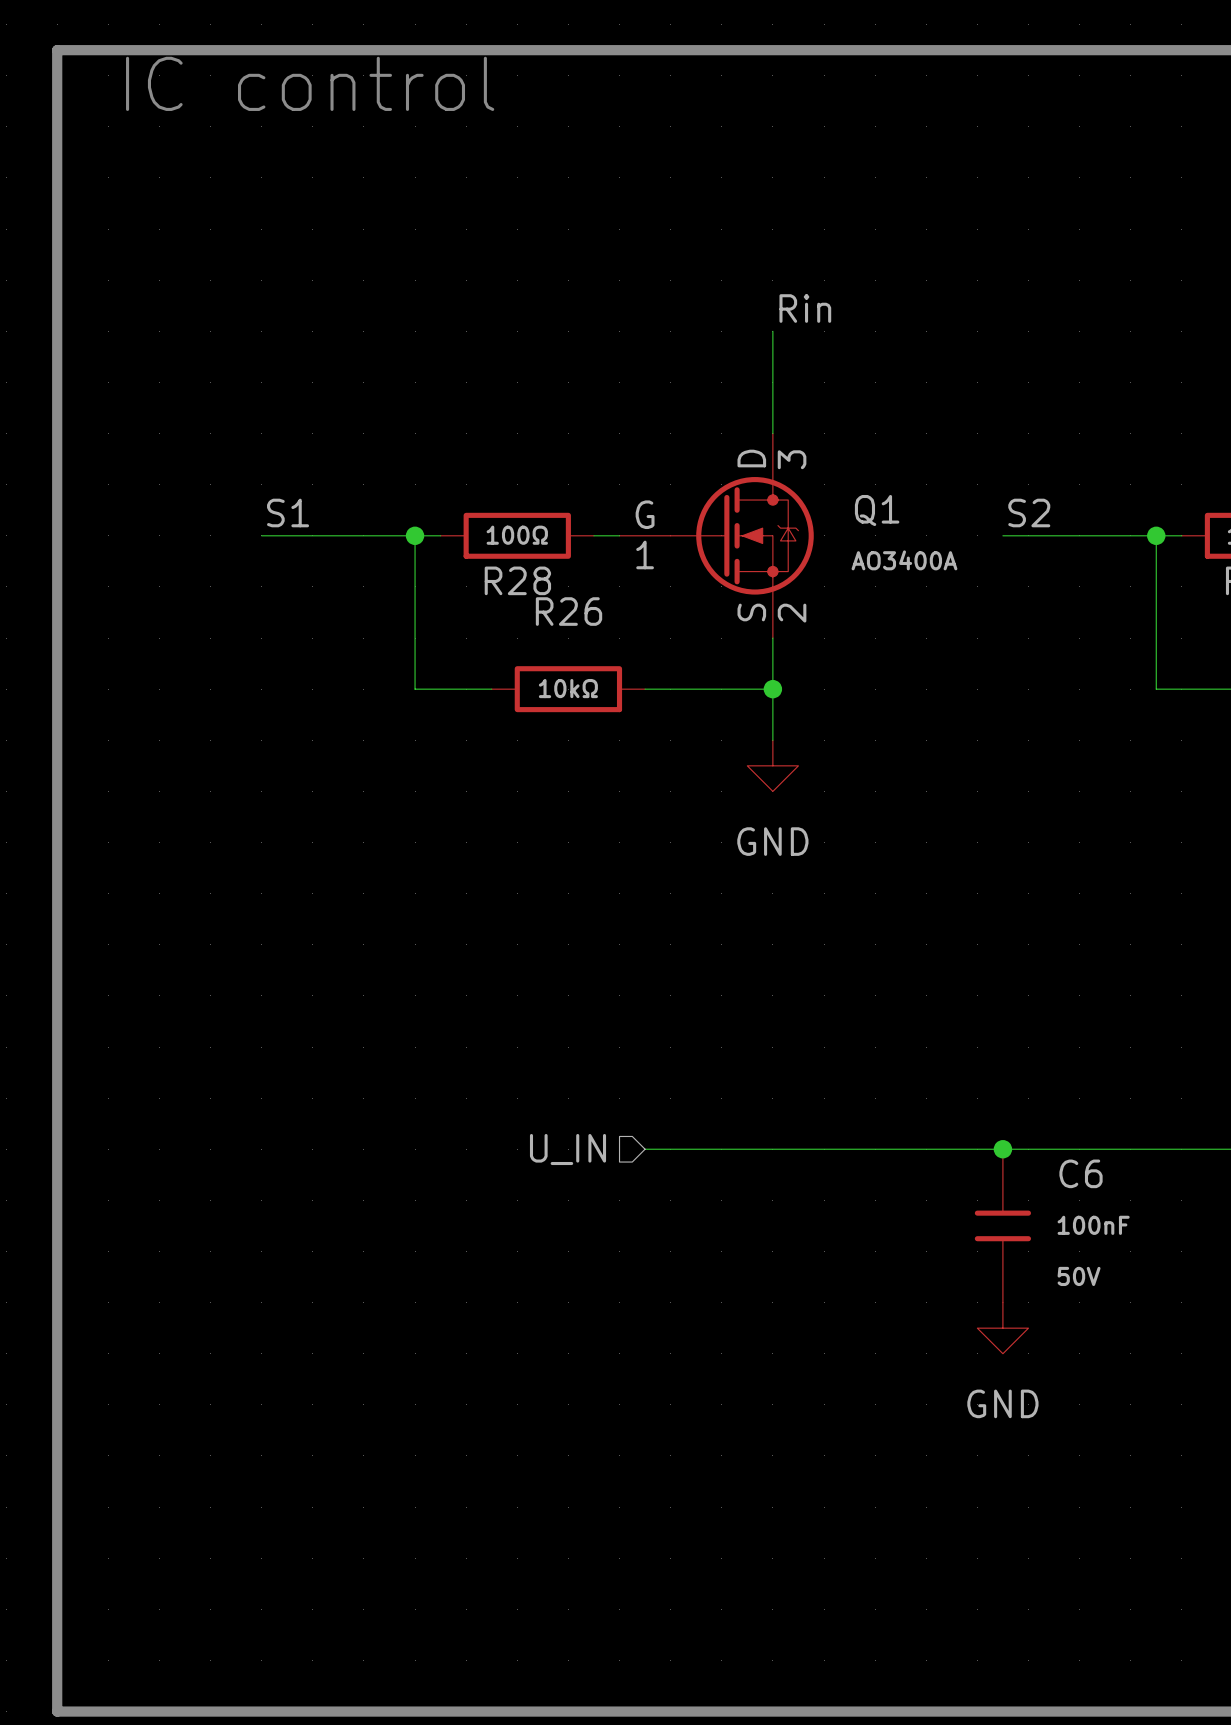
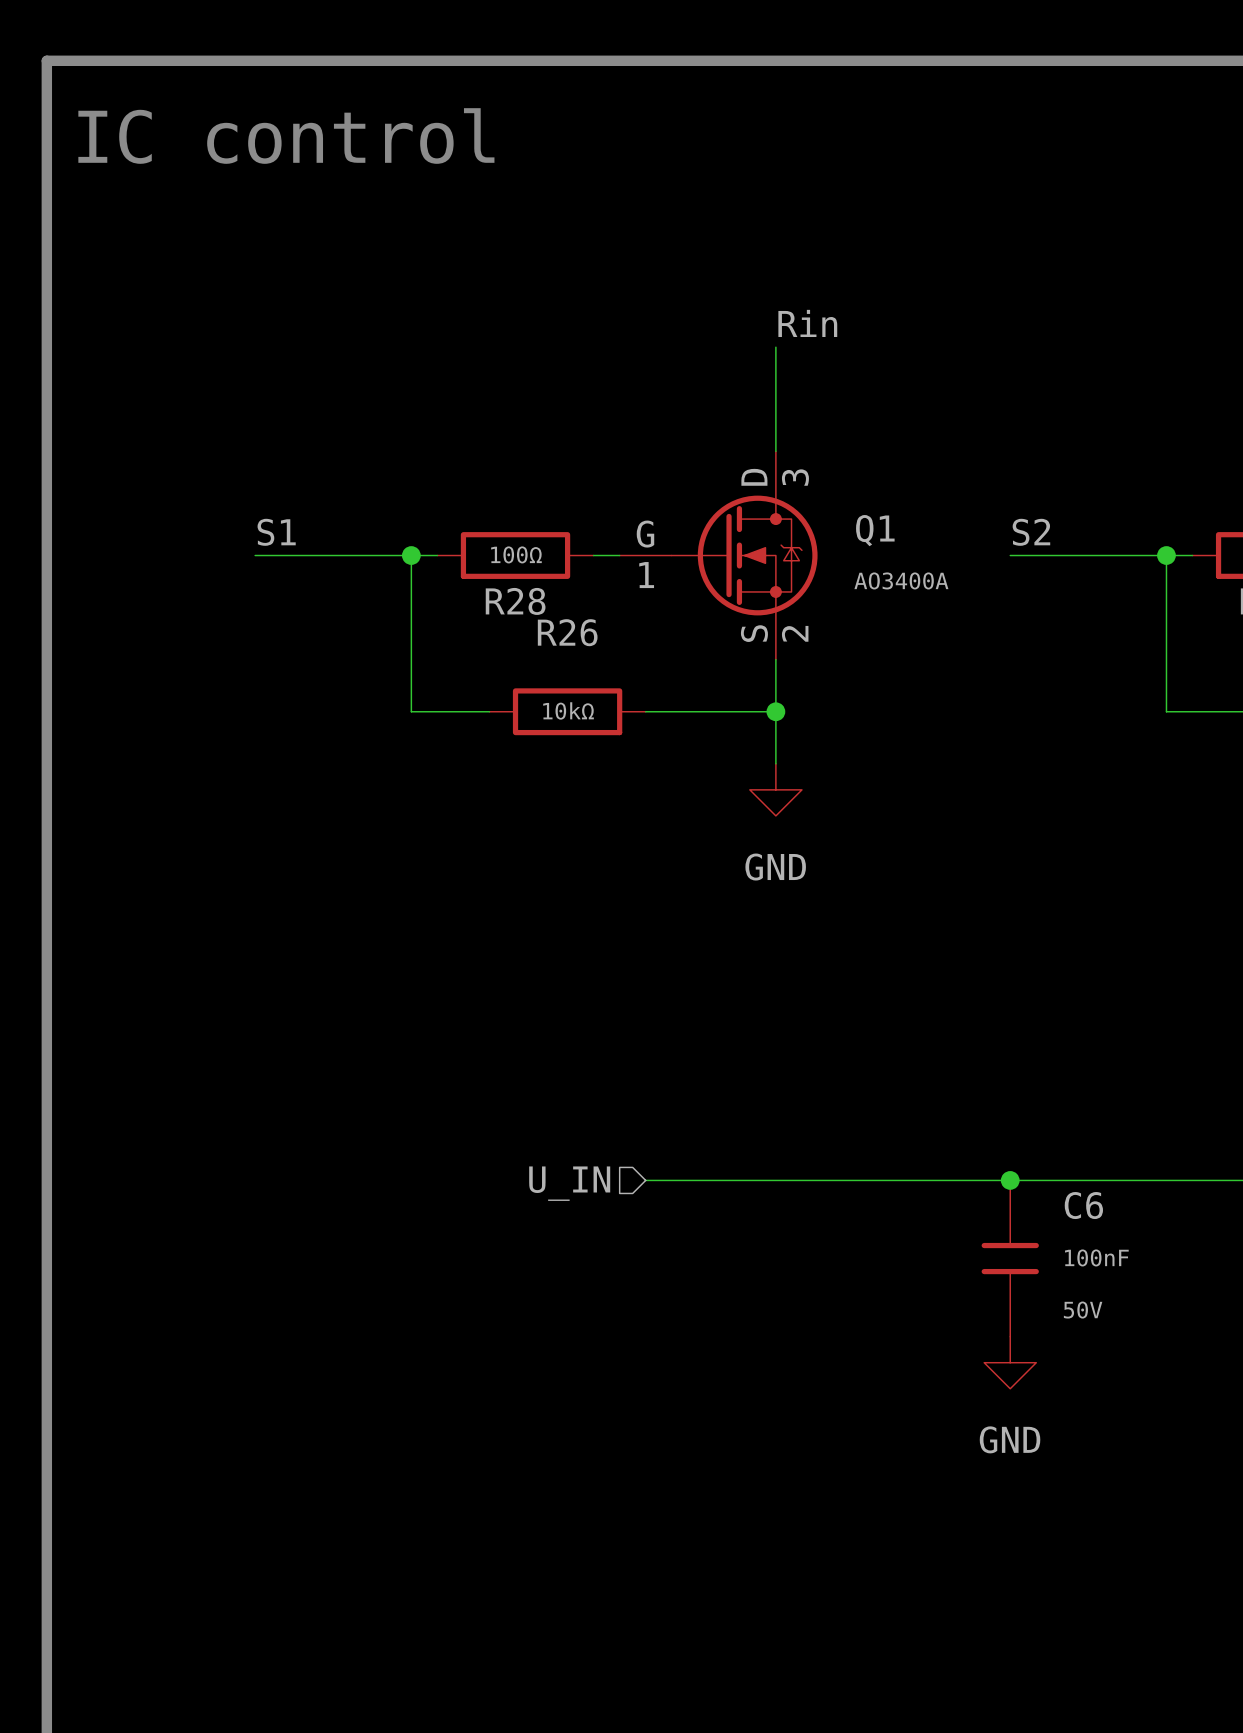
text position: IC control (310, 83) -> IC control (286, 136)

